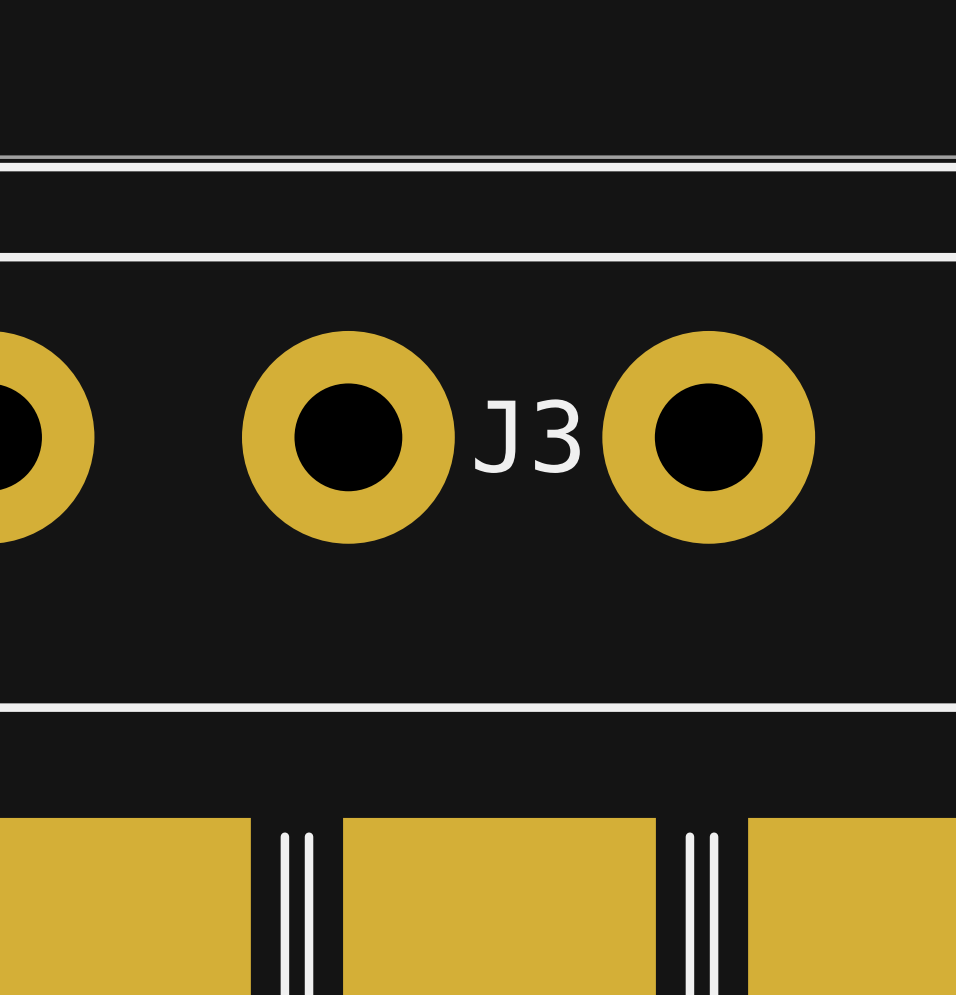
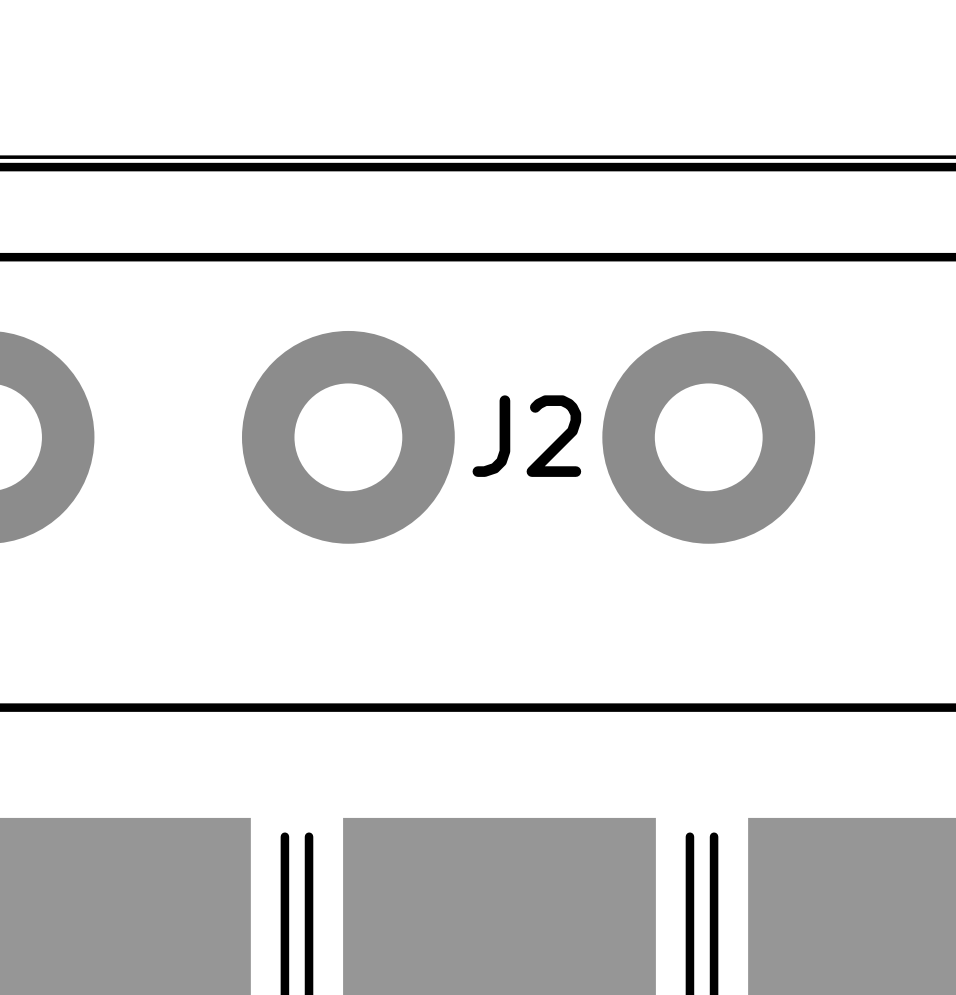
J3 name: J3 (527, 436) -> J2 (526, 436)

